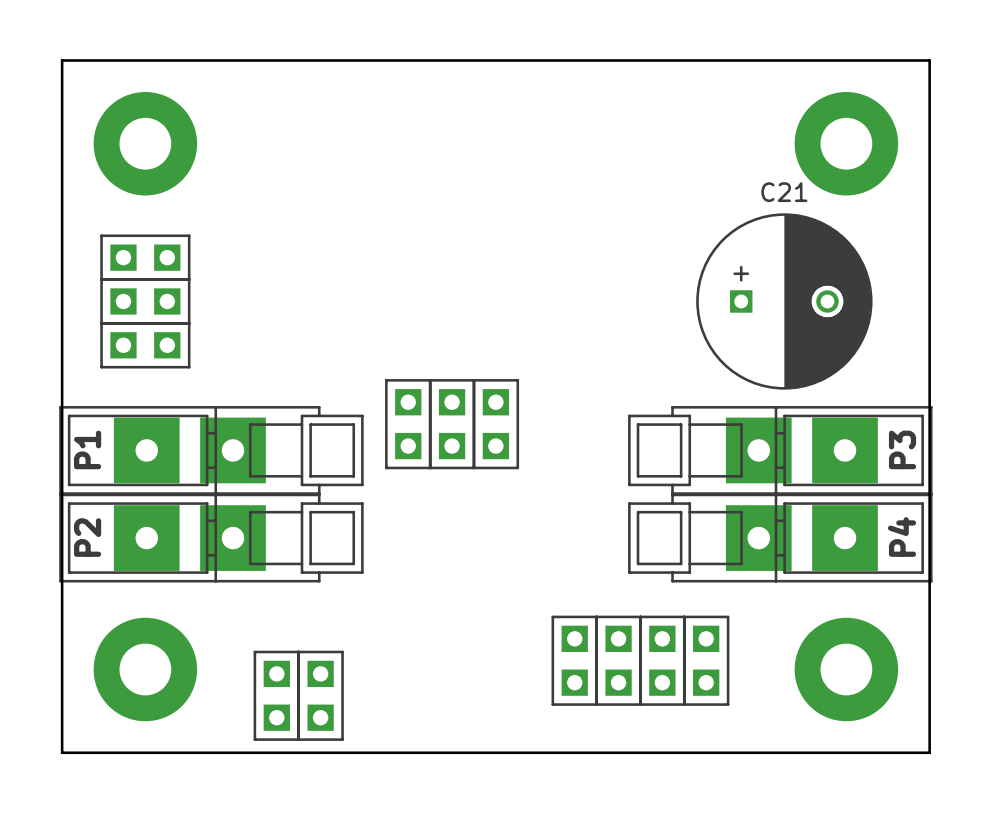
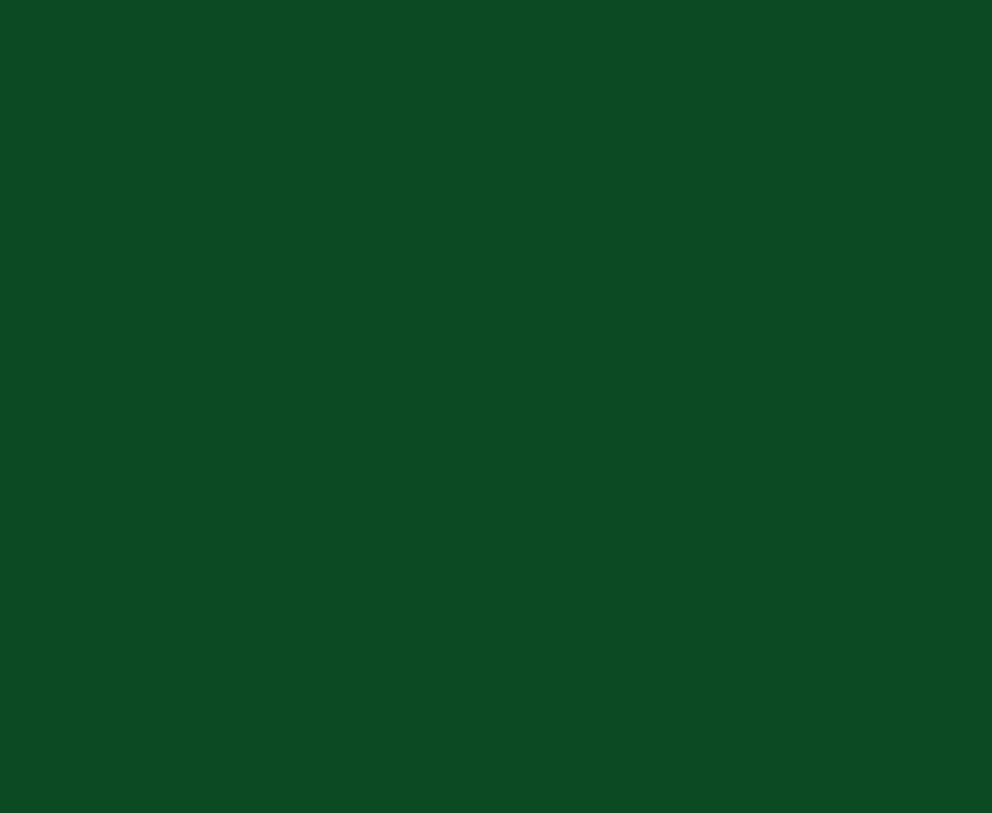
board edge: (62, 60) (62, 752) (929, 752) (929, 60) (62, 60) -> none
part: (145, 143) -> none
part: (846, 143) -> none
part: (145, 257) -> none
part: (145, 301) -> none
C21: (784, 301) -> none
part: (145, 345) -> none
part: (408, 424) -> none
part: (452, 424) -> none
part: (495, 424) -> none
P1: (211, 450) -> none
P3: (780, 450) -> none
P2: (211, 538) -> none
P4: (780, 538) -> none
part: (574, 660) -> none
part: (618, 660) -> none
part: (662, 660) -> none
part: (706, 660) -> none
part: (145, 669) -> none
part: (846, 669) -> none
part: (276, 695) -> none
part: (320, 695) -> none

